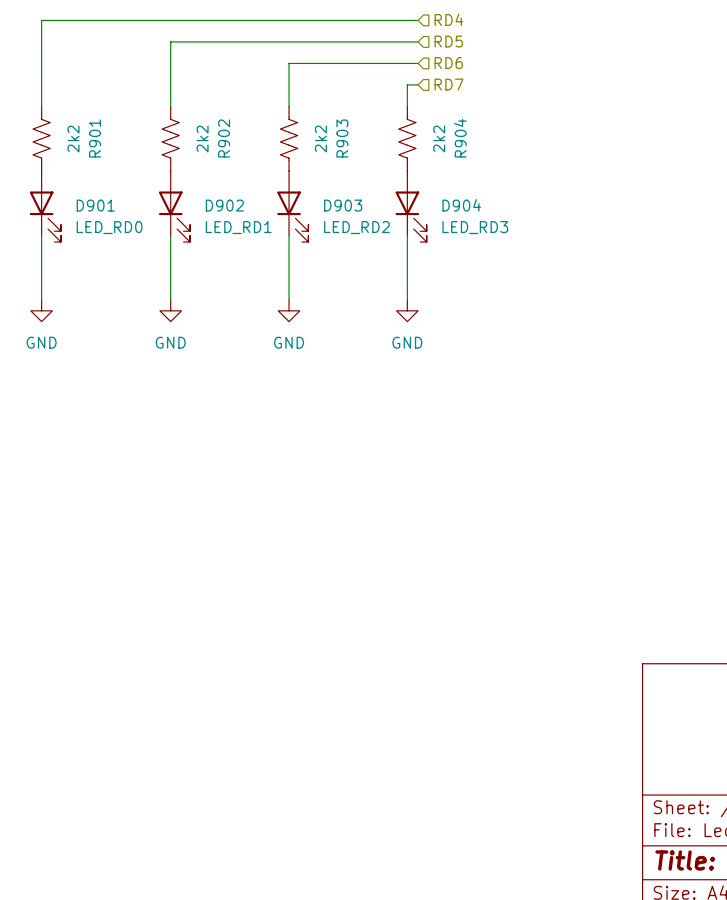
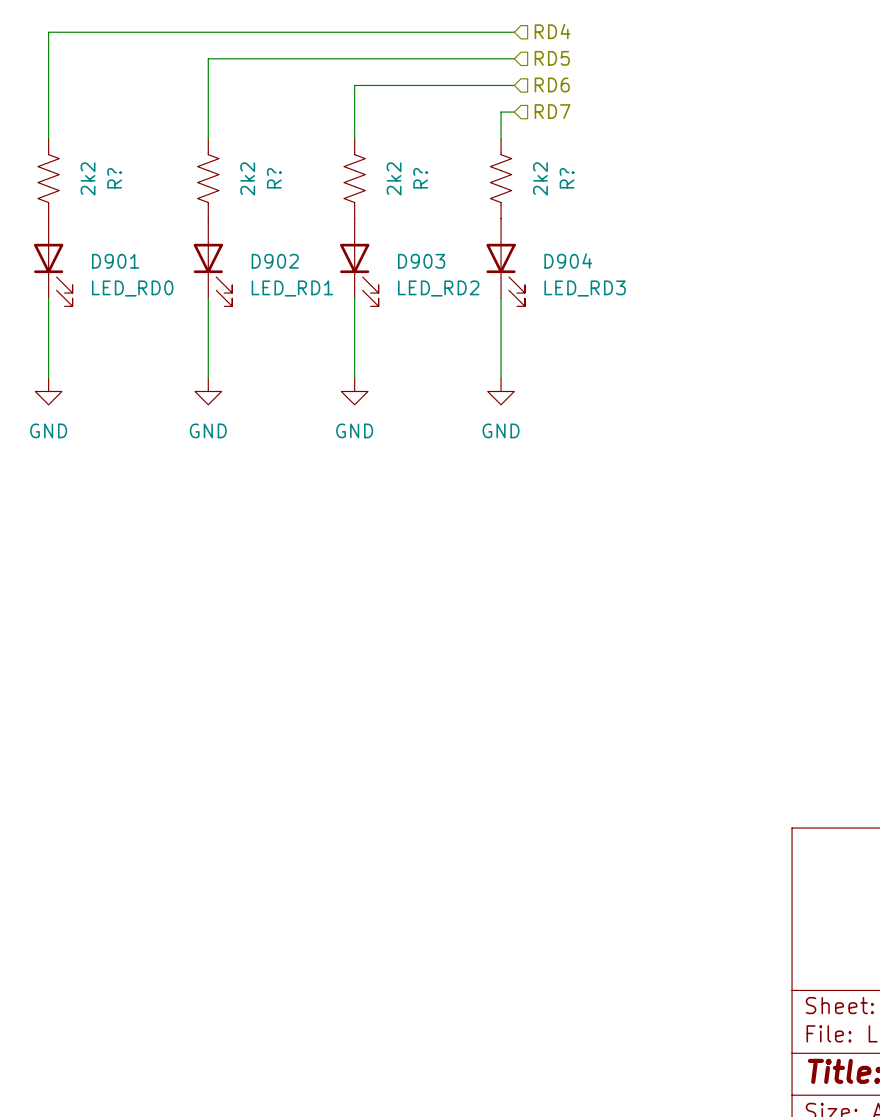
R901 name: R901 (95, 138) -> R? (114, 178)
R902 name: R902 (224, 138) -> R? (274, 178)
R903 name: R903 (342, 138) -> R? (420, 178)
R904 name: R904 (460, 138) -> R? (567, 178)

